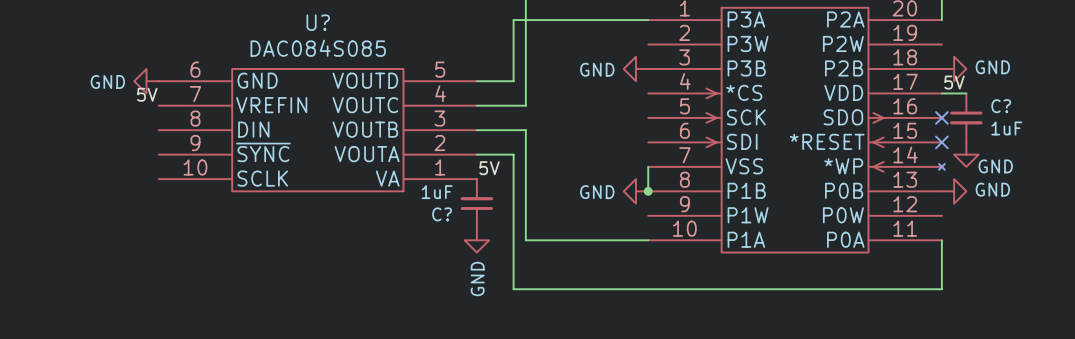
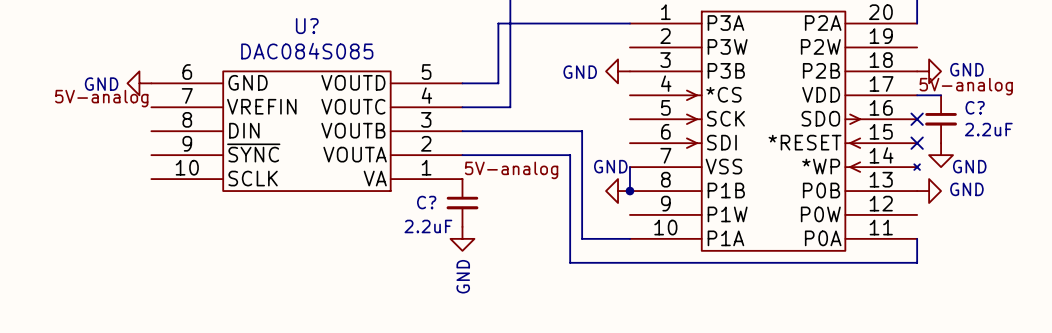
label: 5V (954, 82) -> 5V-analog (966, 86)
label: 5V (147, 94) -> 5V-analog (101, 98)
C? value: 1uF (1006, 128) -> 2.2uF (988, 129)
wire: (525, 130) (525, 240) (599, 240) -> (510, 131) (582, 131) (582, 238)
wire: (513, 154) (513, 289) (941, 289) (941, 264) -> (498, 155) (570, 155) (570, 262) (917, 262)
label: 5V (489, 168) -> 5V-analog (511, 170)
C? value: 1uF (437, 192) -> 2.2uF (428, 226)
power symbol text position: GND (597, 192) -> GND (610, 166)
C? rotation: 0° (476, 203) -> 180° (462, 203)

